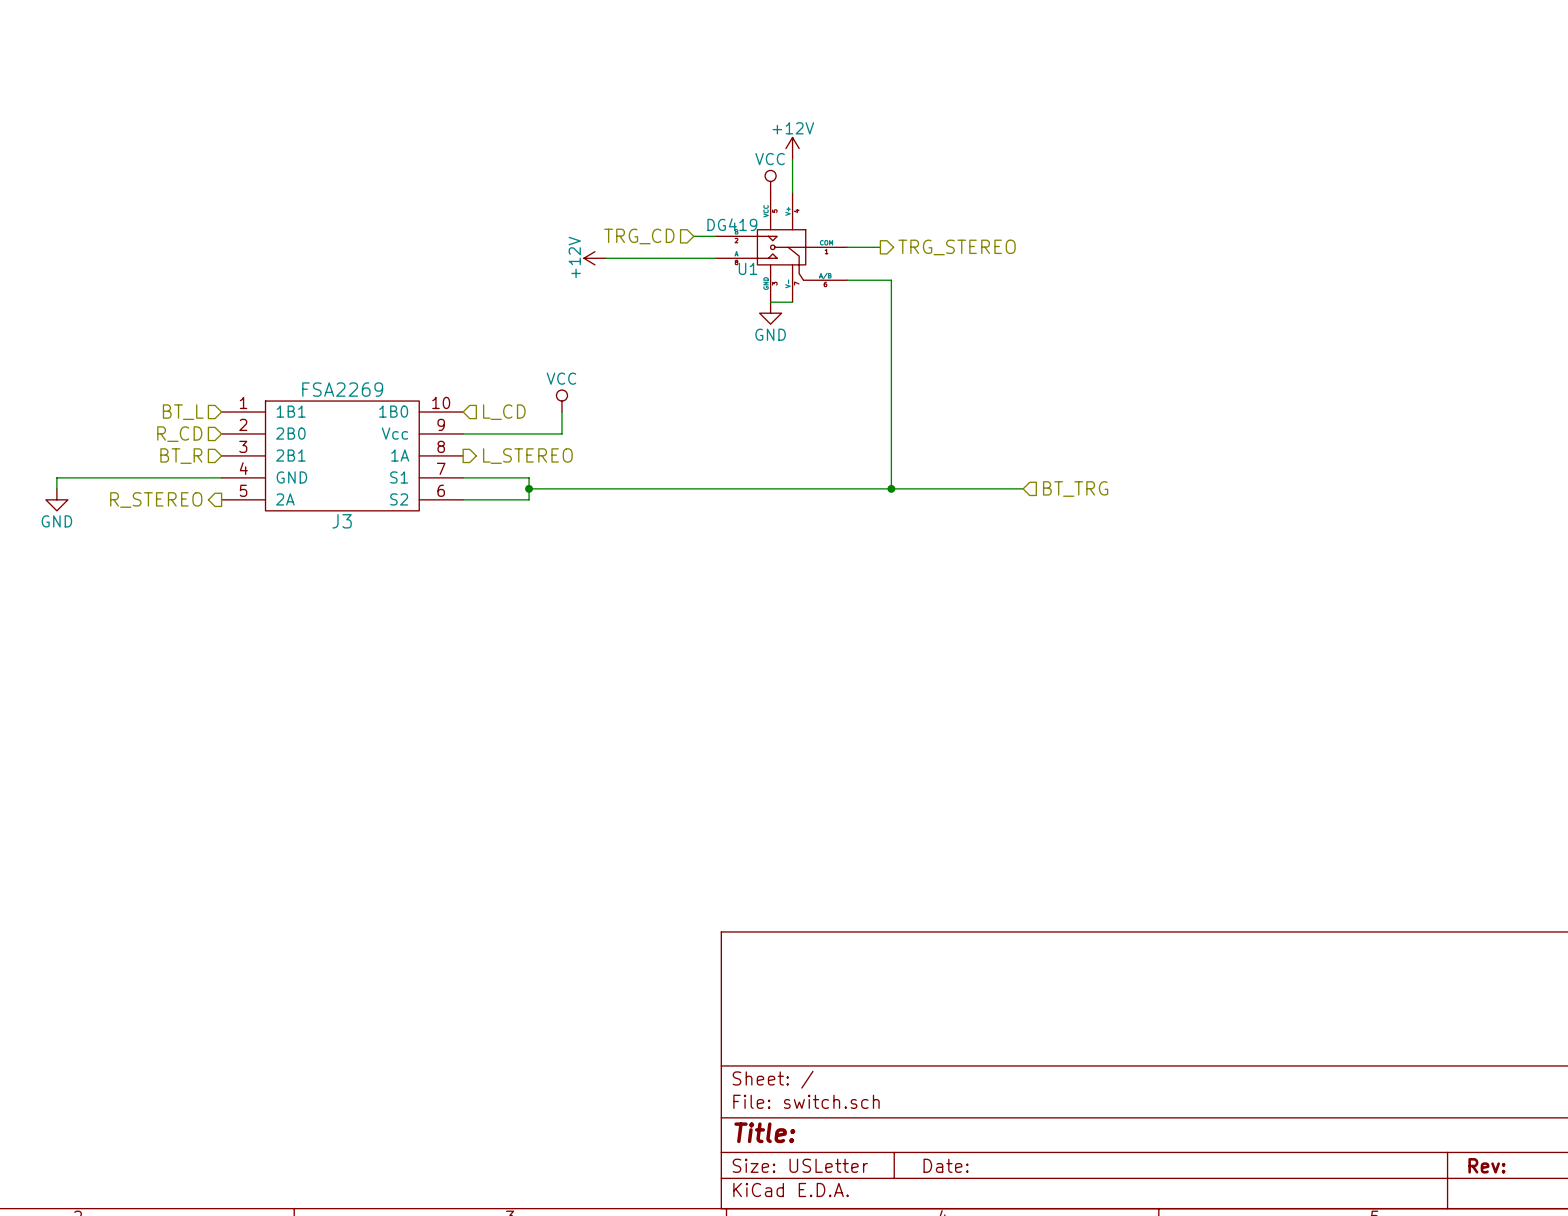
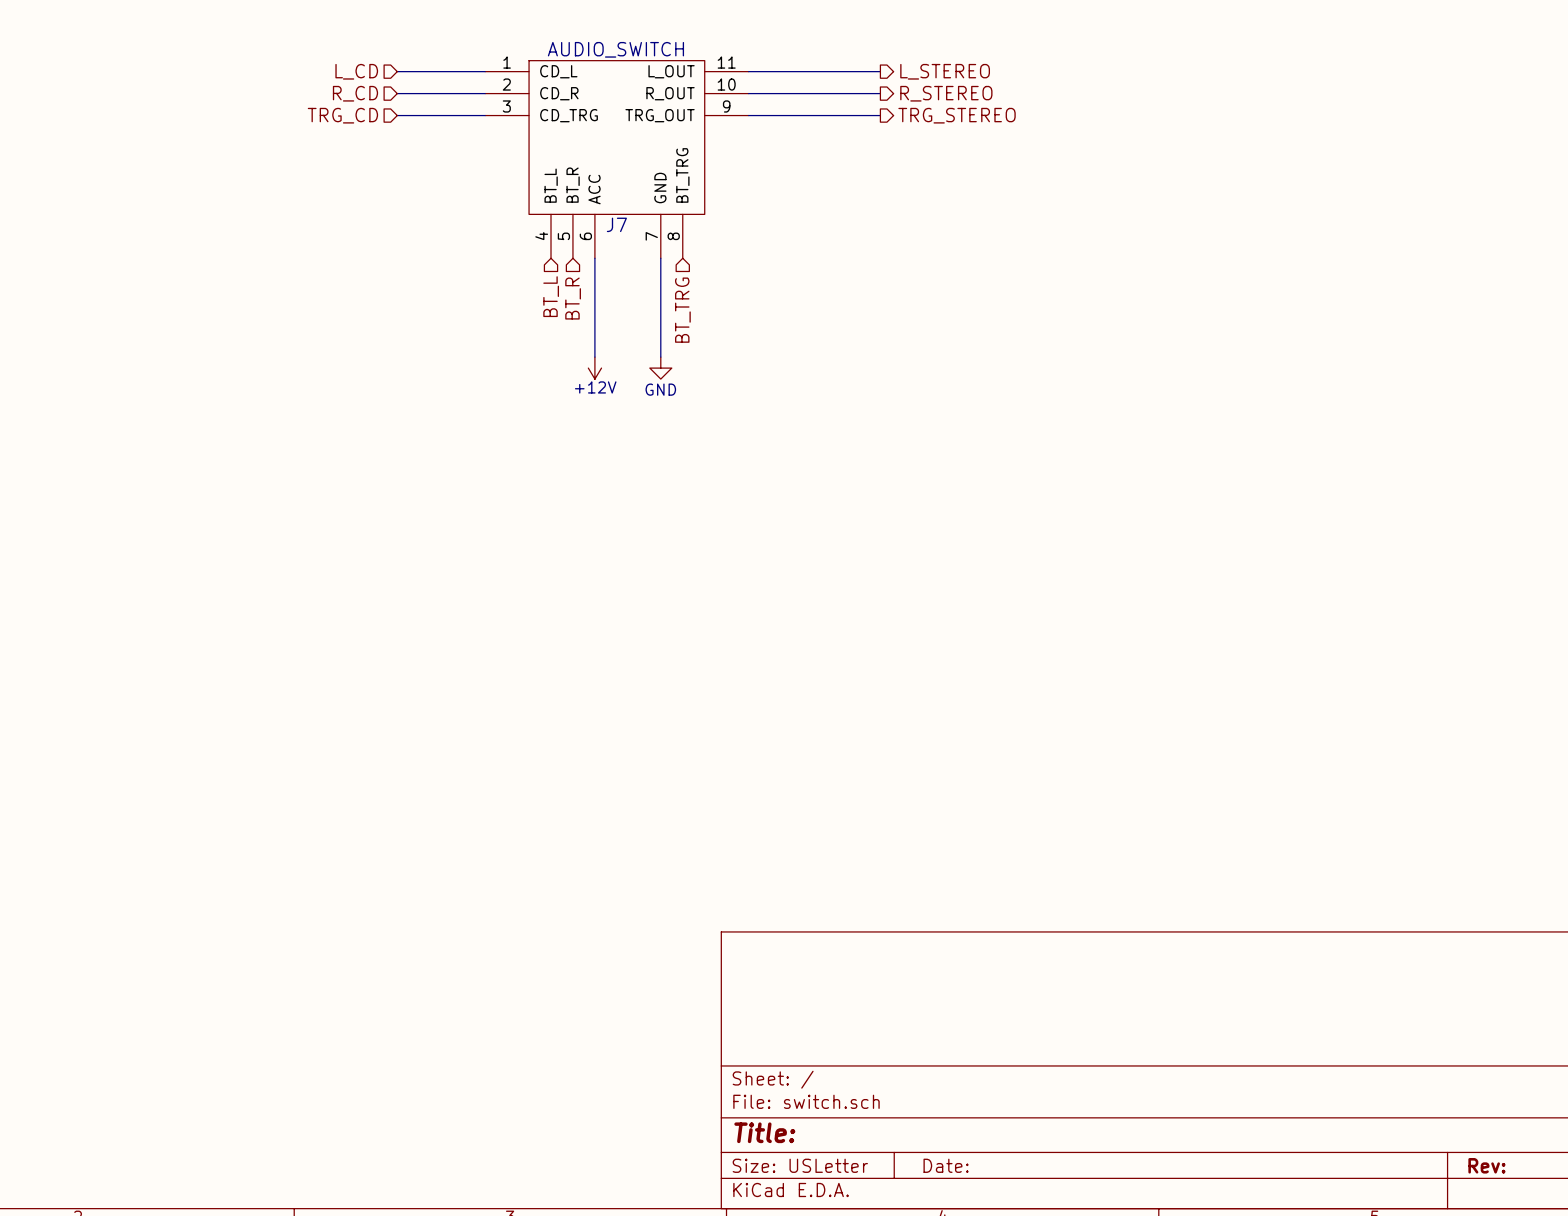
hierarchical label: none -> L_CD (356, 71)
wire: none -> (397, 71) (485, 71)
wire: none -> (748, 71) (880, 71)
hierarchical label: none -> L_STEREO (945, 71)
hierarchical label: none -> R_CD (355, 93)
wire: none -> (397, 93) (485, 93)
wire: none -> (748, 93) (880, 93)
hierarchical label: none -> R_STEREO (946, 93)
hierarchical label: none -> TRG_CD (342, 115)
wire: none -> (397, 115) (485, 115)
wire: none -> (748, 115) (880, 115)
power symbol: +12V (792, 148) -> none
J7: none -> AUDIO_SWITCH (616, 159)
wire: (792, 159) (792, 192) -> none
power symbol: VCC (770, 181) -> none
hierarchical label: TRG_CD (639, 236) -> none
wire: (693, 236) (715, 236) -> none
U1: DG419 (781, 247) -> none
wire: (847, 247) (880, 247) -> none
hierarchical label position: TRG_STEREO (957, 247) -> TRG_STEREO (957, 115)
wire: none -> (594, 258) (594, 357)
power symbol rotation: 0° (594, 258) -> 90° counterclockwise (594, 368)
power symbol position: +12V (594, 258) -> +12V (594, 368)
wire: (605, 258) (715, 258) -> none
wire: none -> (660, 258) (660, 357)
wire: (847, 280) (891, 280) (891, 488) -> none
hierarchical label: none -> BT_L (551, 296)
hierarchical label: none -> BT_R (573, 298)
wire: (770, 302) (792, 302) -> none
hierarchical label: none -> BT_TRG (682, 310)
power symbol position: GND (770, 313) -> GND (660, 368)
power symbol: VCC (561, 401) -> none
hierarchical label: BT_L (183, 412) -> none
hierarchical label: L_CD (504, 412) -> none
wire: (561, 412) (561, 433) (463, 433) -> none
hierarchical label: R_CD (179, 434) -> none
J3: FSA2269 (342, 455) -> none
hierarchical label: BT_R (181, 456) -> none
hierarchical label: L_STEREO (527, 456) -> none
wire: (221, 477) (56, 477) (56, 488) -> none
wire: (463, 477) (529, 477) (529, 499) (463, 499) -> none
wire: (529, 488) (1023, 488) -> none
junction: (529, 488) -> none
junction: (891, 488) -> none
hierarchical label: BT_TRG (1075, 489) -> none
power symbol: GND (56, 499) -> none
hierarchical label: R_STEREO (156, 499) -> none

